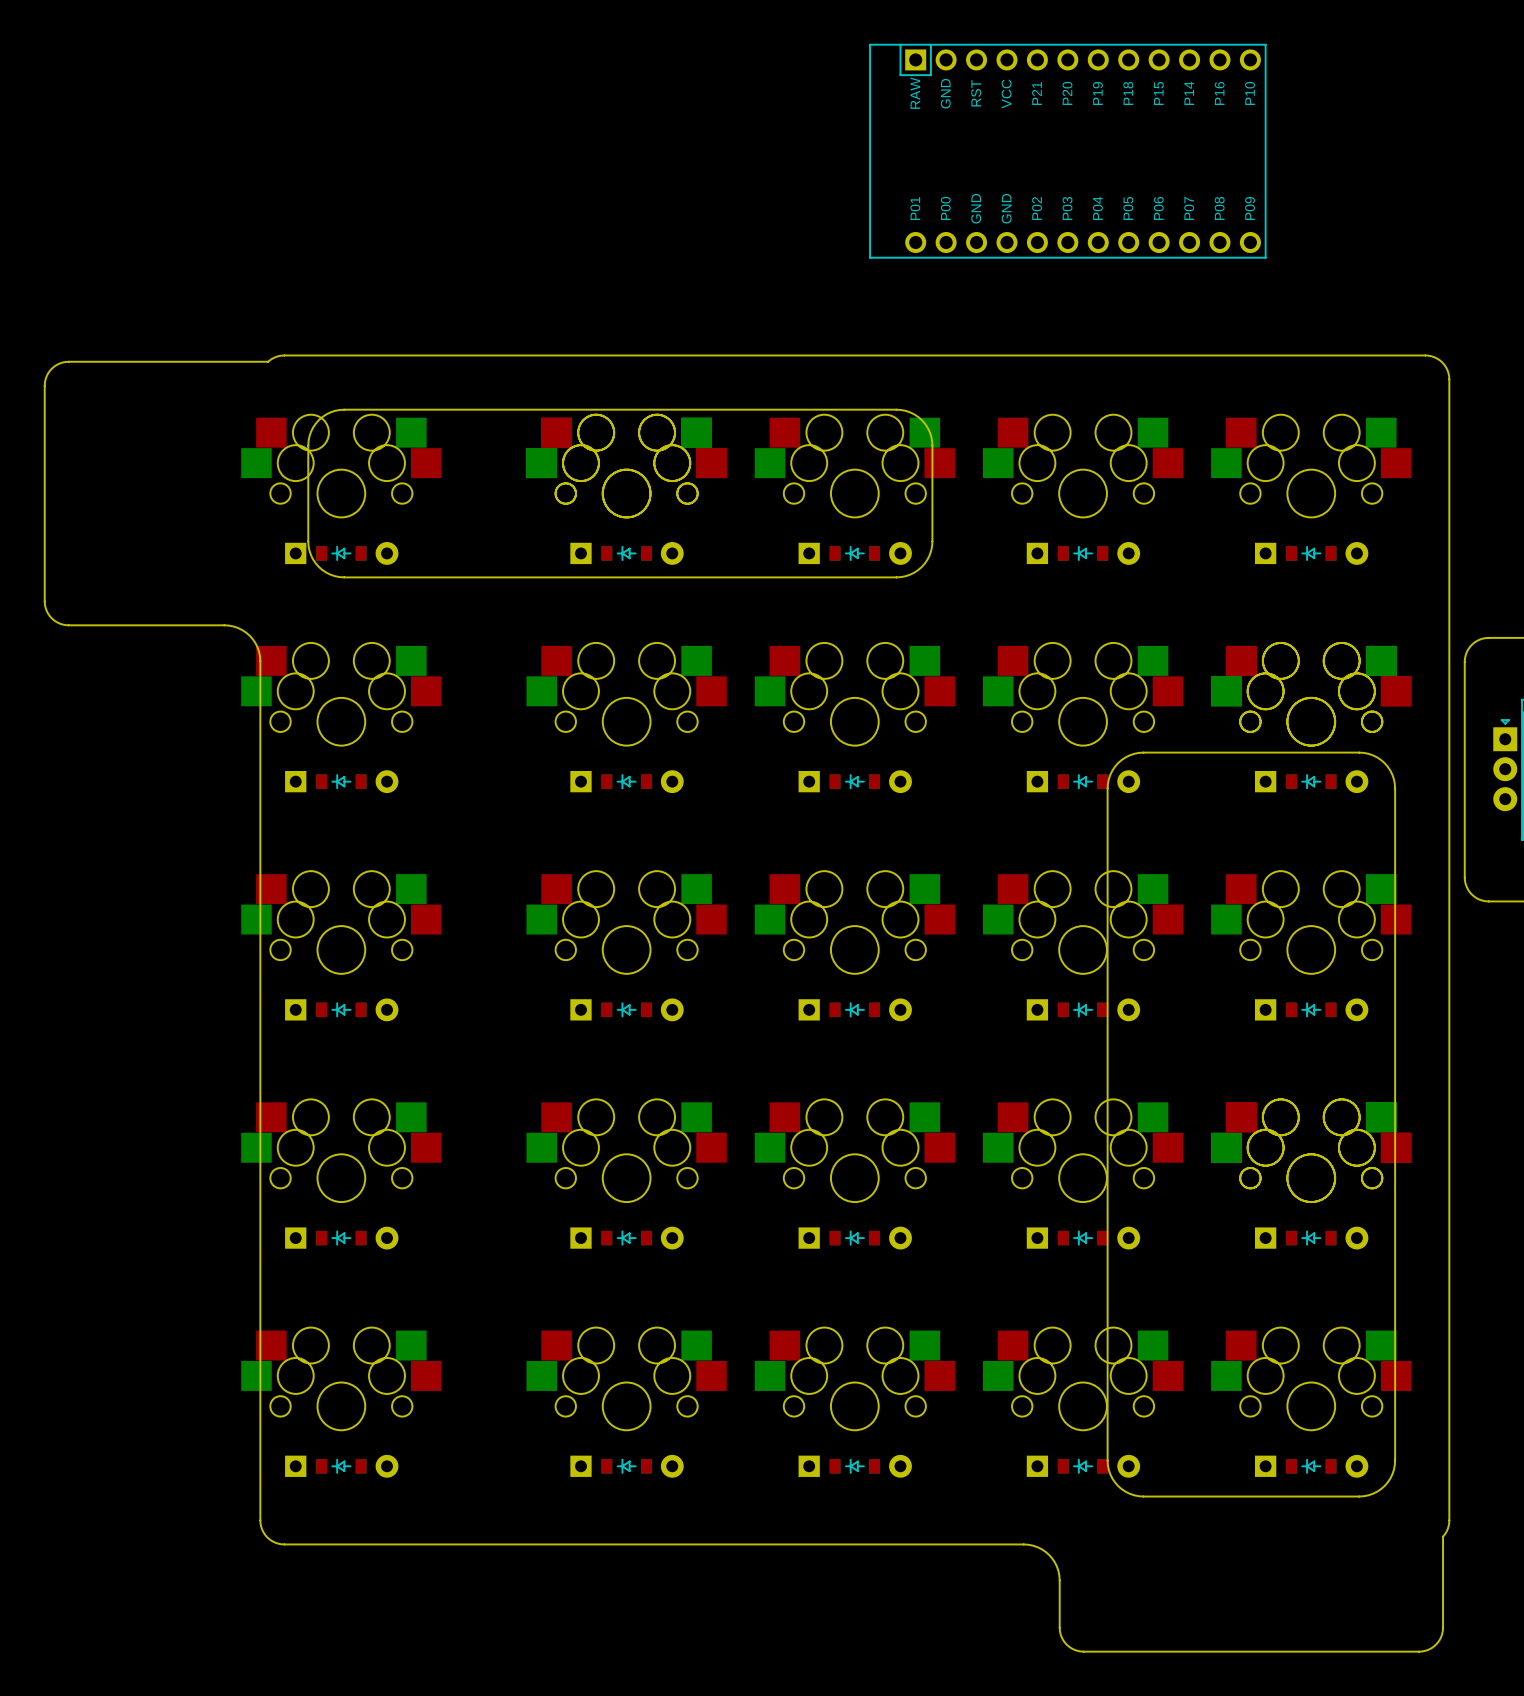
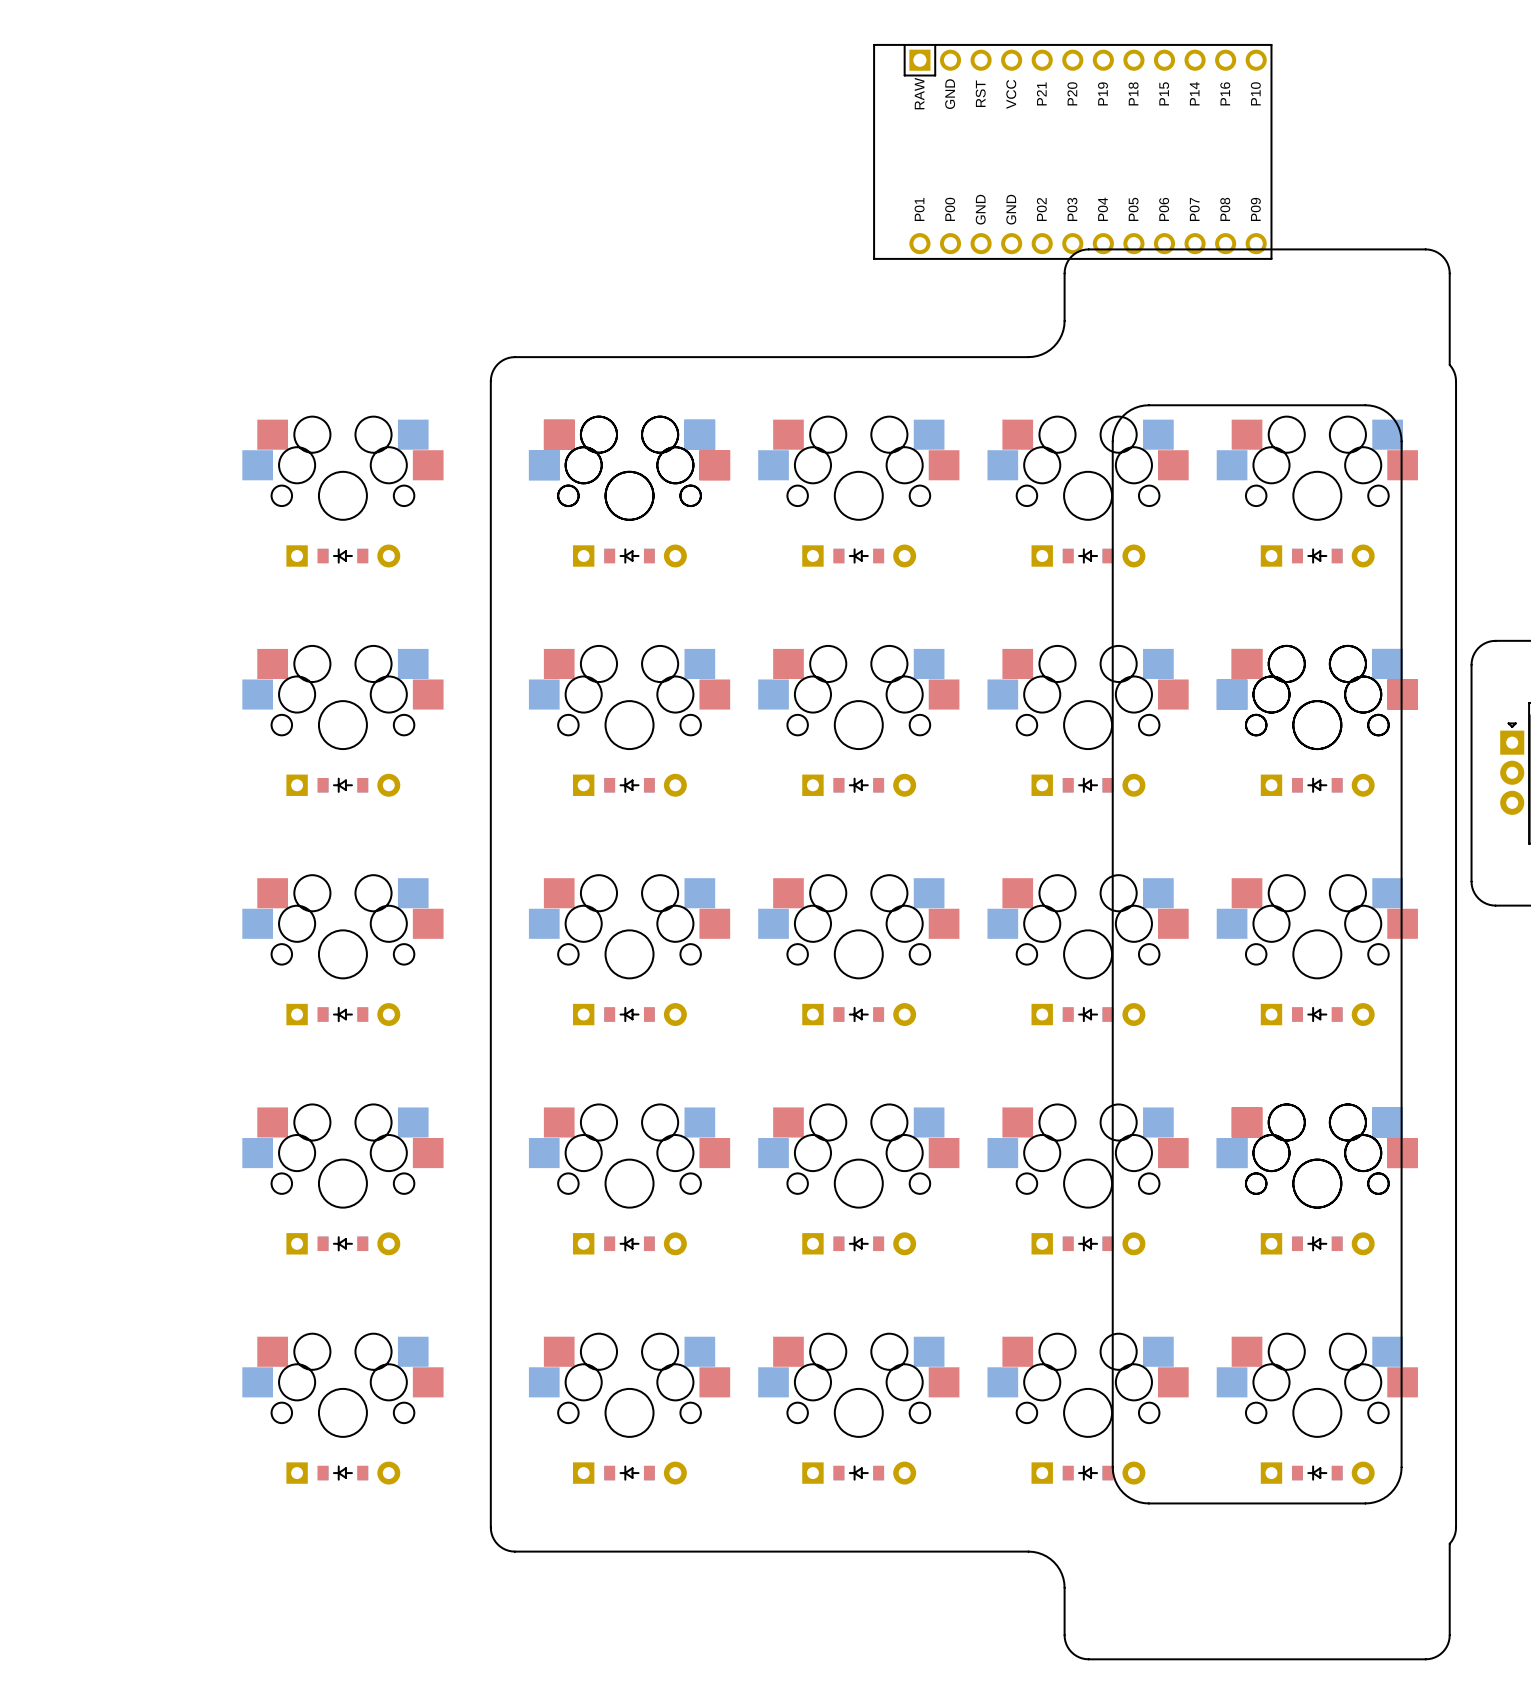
board edge: (284, 355) (275, 357) (268, 361) (68, 361) (59, 363) (51, 368) (46, 376) (44, 385) (44, 604) (51, 618) (65, 625) (233, 626) (249, 635) (259, 651) (260, 1520) (263, 1532) (272, 1541) (284, 1544) (512, 1544) -> (514, 357) (505, 358) (497, 364) (492, 371) (490, 381) (490, 1527) (492, 1536) (497, 1544) (505, 1549) (514, 1551)
board edge: (284, 355) (512, 355) -> none
board edge: (1023, 355) (1425, 355) -> (1028, 357) (1046, 352) (1059, 339) (1064, 325) (1065, 267) (1071, 256) (1082, 250) (1425, 249) (1440, 254) (1448, 267) (1449, 364) (1454, 372) (1456, 381)
board edge: (1425, 355) (1434, 357) (1442, 362) (1447, 370) (1449, 379) -> none
board edge: (344, 409) (905, 410) (921, 420) (929, 431) (932, 440) (931, 550) (927, 559) (918, 569) (905, 576) (896, 577) (334, 576) (318, 566) (309, 550) (308, 445) (311, 431) (318, 420) (330, 412) (344, 409) -> none
board edge: (1107, 788) (1110, 774) (1118, 763) (1129, 755) (1143, 752) (1363, 752) (1372, 755) (1384, 763) (1392, 774) (1395, 788) -> (1112, 792) (1113, 436) (1115, 427) (1123, 415) (1135, 408) (1148, 405) (1370, 405) (1383, 410) (1396, 423) (1401, 441) (1401, 792)

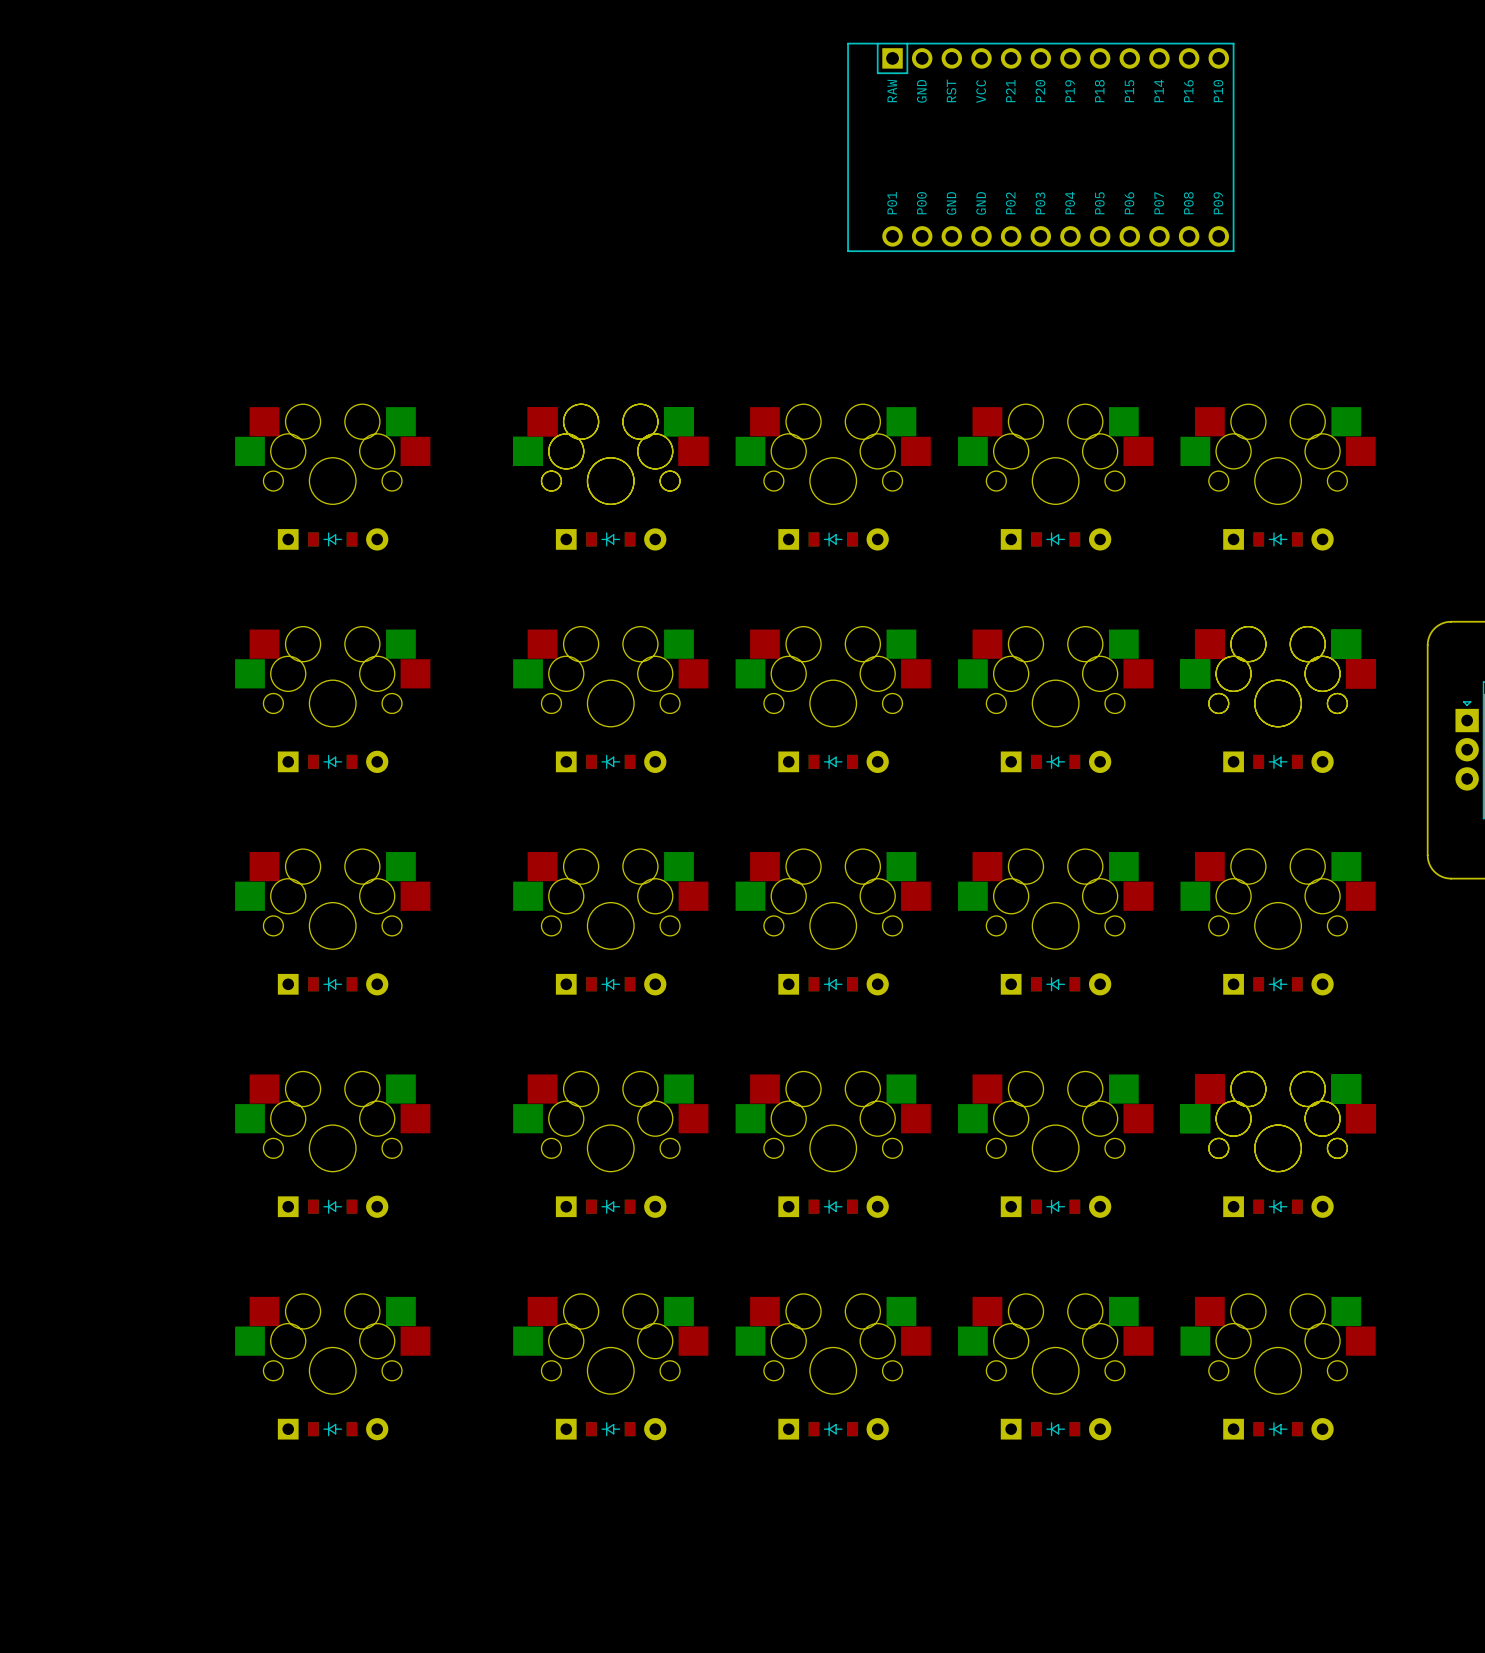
board edge: (514, 357) (505, 358) (497, 364) (492, 371) (490, 381) (490, 1527) (495, 1542) (502, 1548) (514, 1551) (1033, 1551) (1050, 1559) (1061, 1573) (1064, 1587) (1065, 1641) (1071, 1652) (1082, 1658) (1425, 1659) (1440, 1654) (1448, 1641) (1449, 1543) (1454, 1536) (1456, 1527) -> none
board edge: (514, 357) (1033, 356) (1050, 349) (1061, 334) (1064, 321) (1065, 267) (1071, 256) (1082, 250) (1425, 249) (1440, 254) (1448, 267) (1449, 364) (1454, 372) (1456, 381) -> none
board edge: (1456, 381) (1456, 1527) -> none
board edge: (1148, 405) (1370, 405) (1379, 408) (1391, 415) (1400, 432) (1401, 1467) (1400, 1476) (1394, 1489) (1383, 1498) (1374, 1502) (1144, 1503) (1130, 1498) (1123, 1492) (1113, 1476) (1112, 441) (1115, 427) (1123, 415) (1135, 408) (1148, 405) -> none

